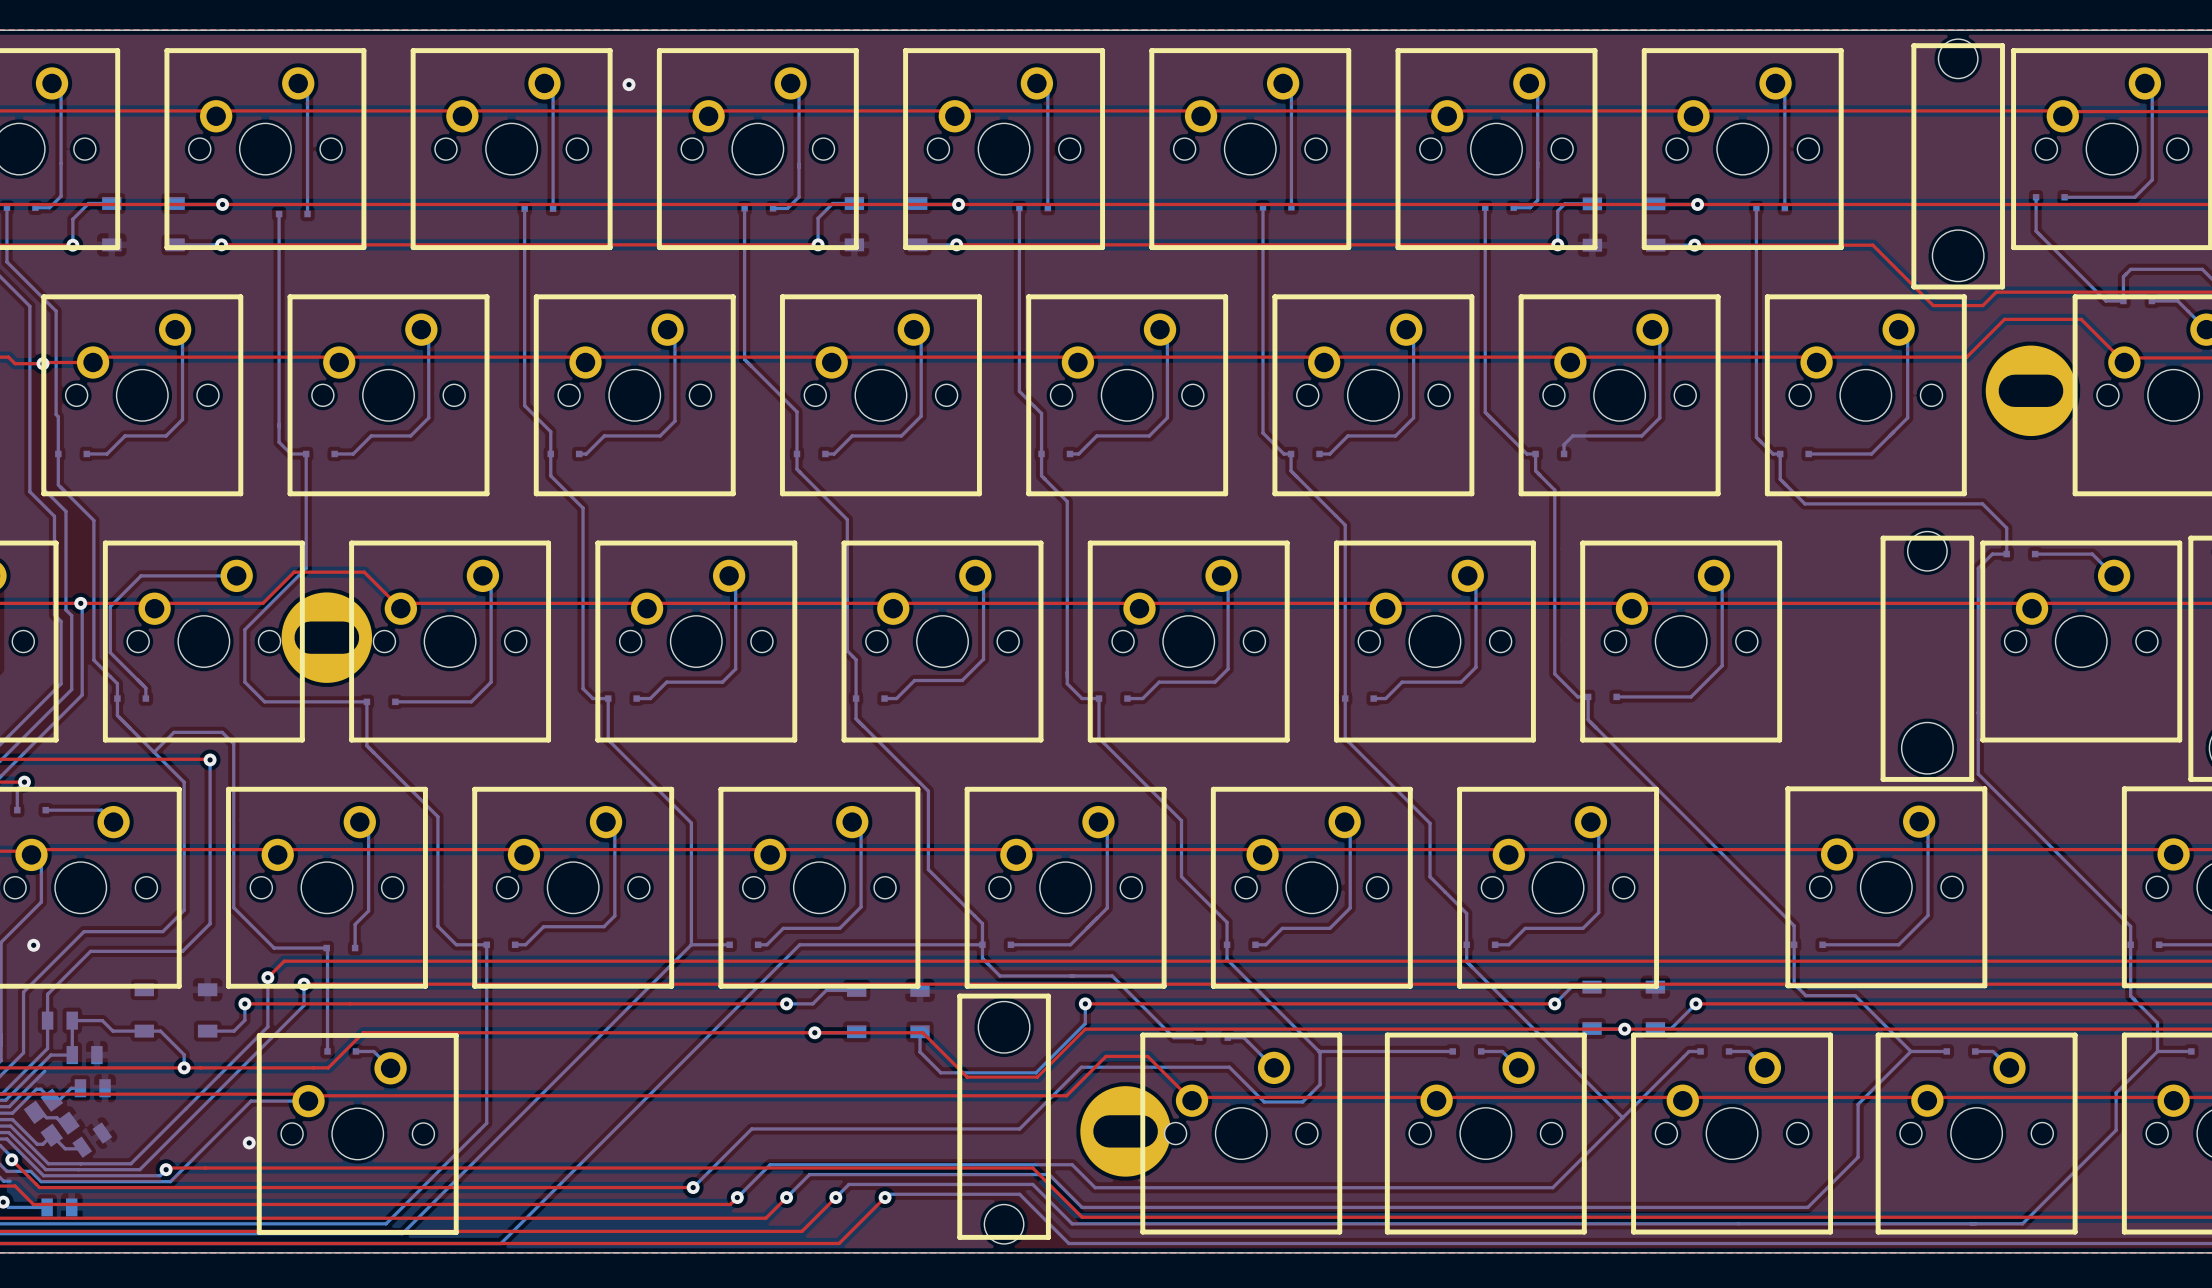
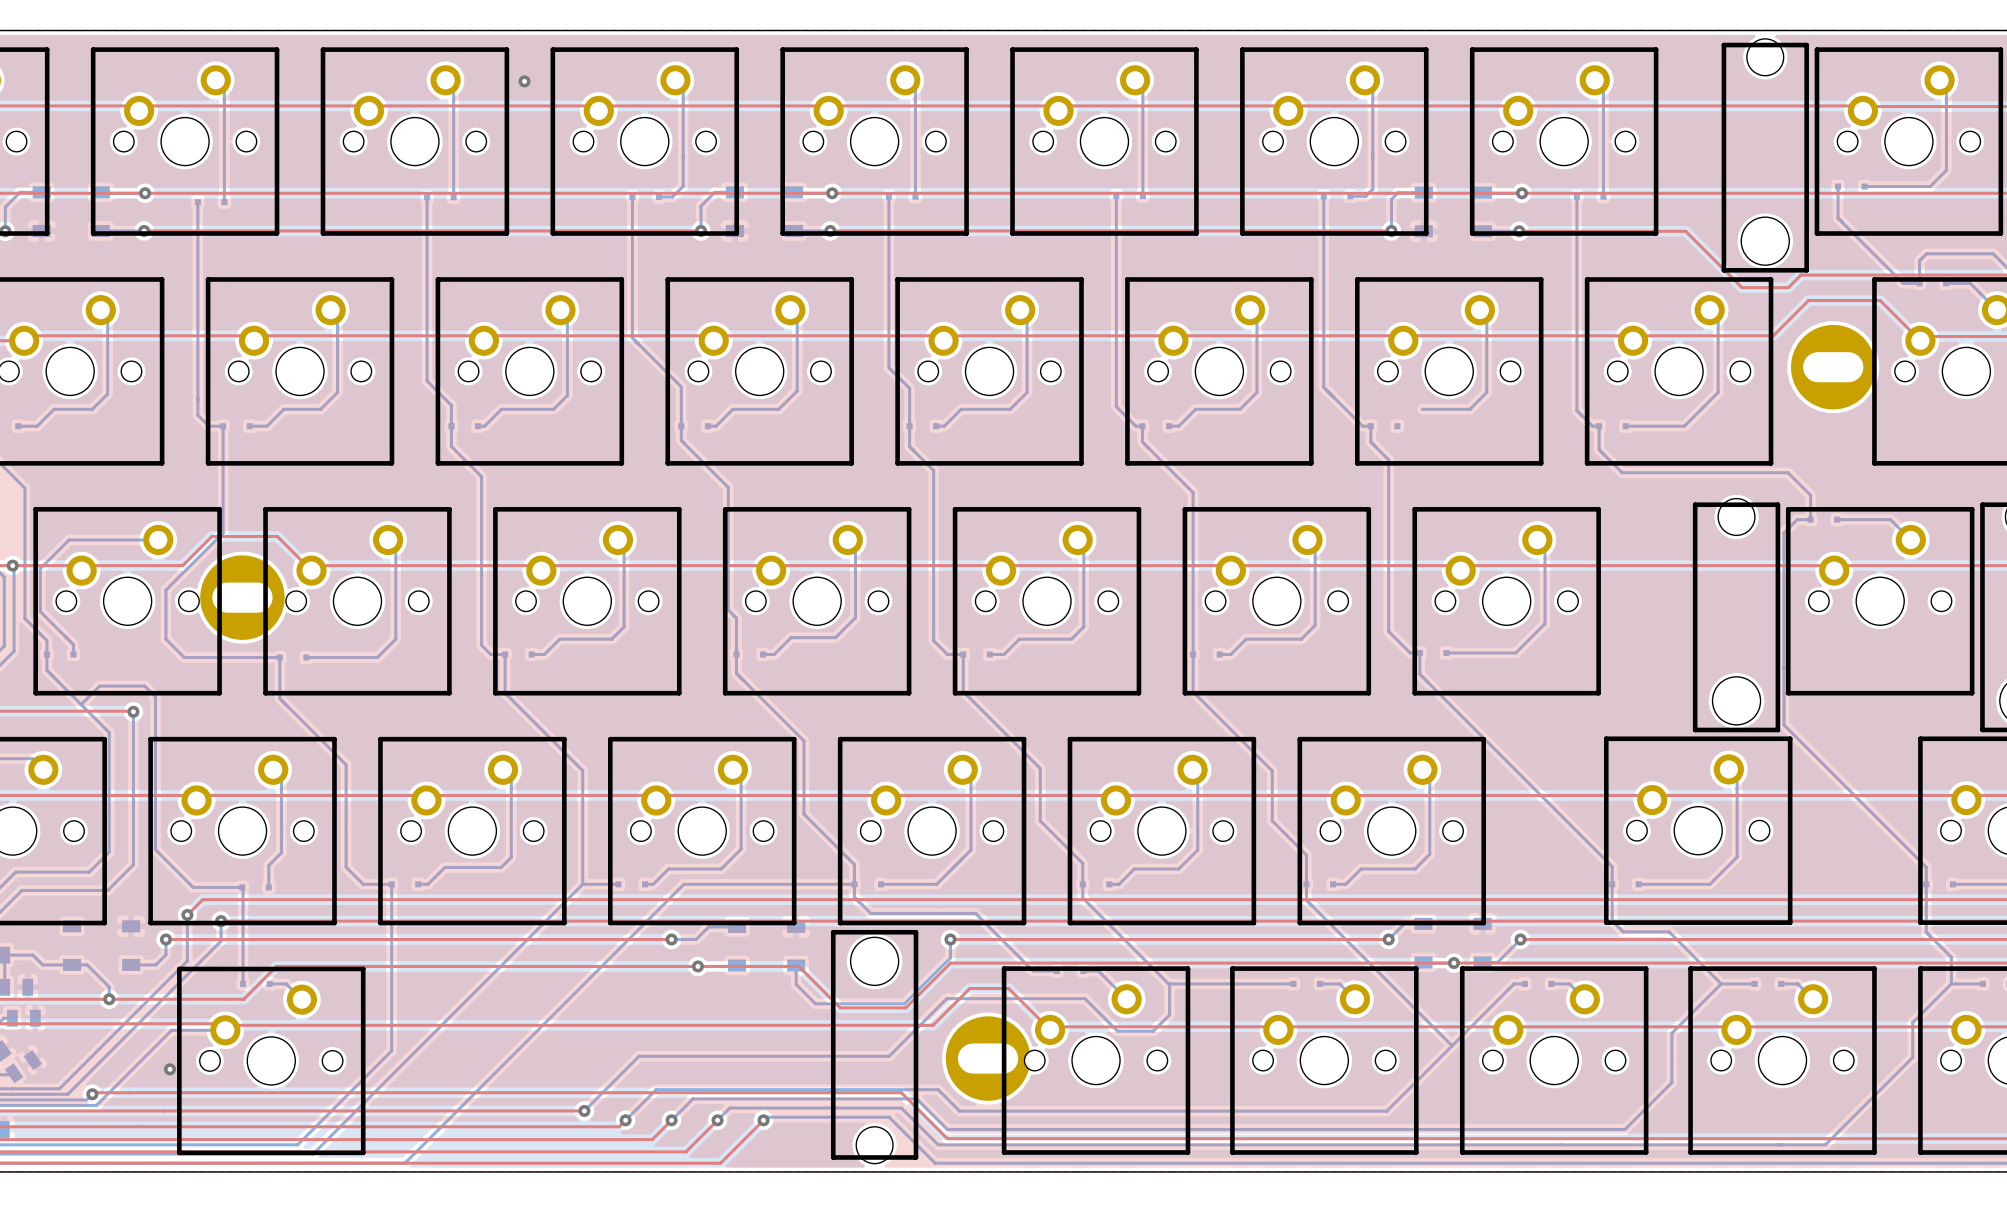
bottom track: (1590, 435) (1572, 435) (1564, 444) (1564, 453) -> none

